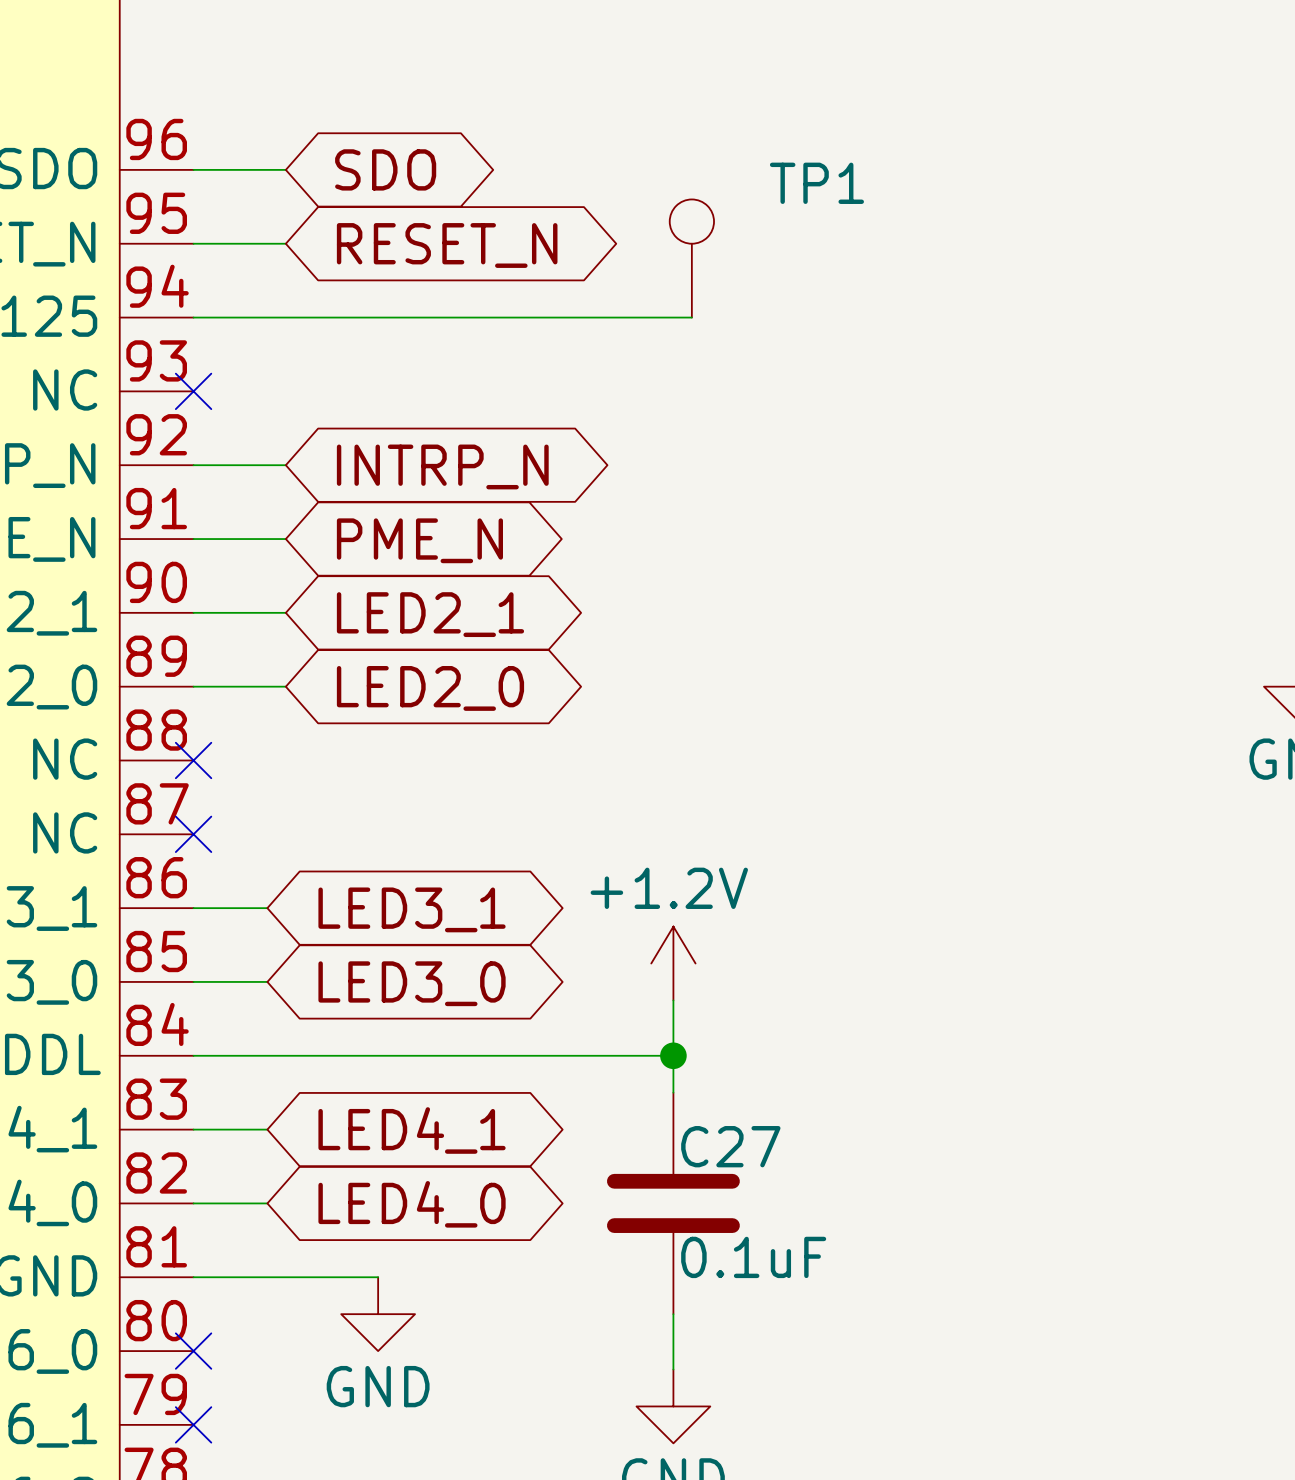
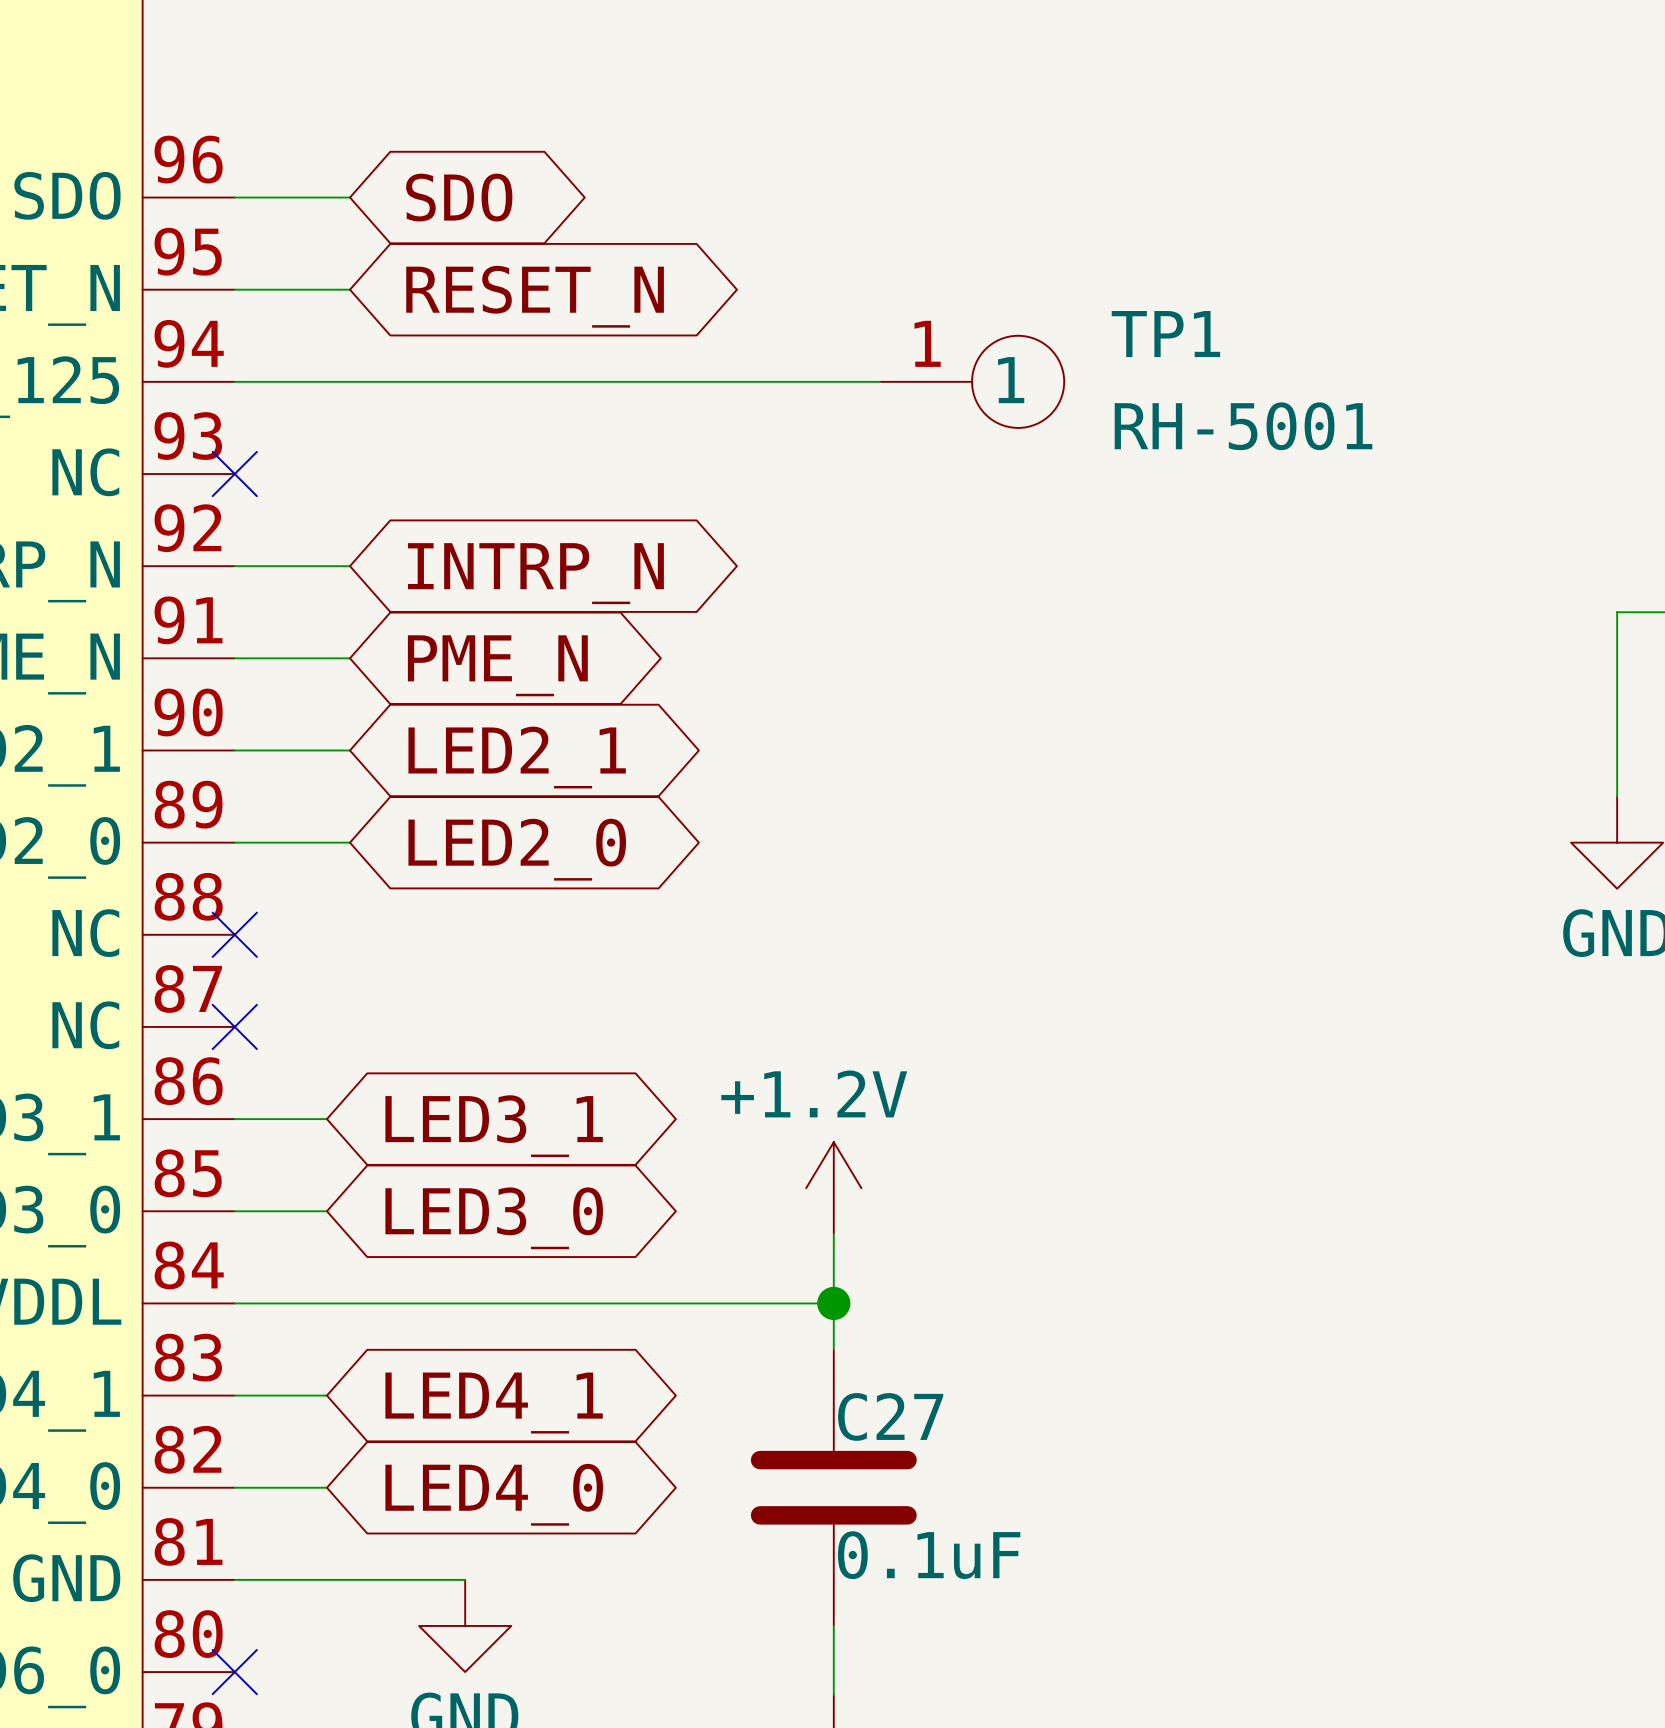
TP1 symbol: [669, 199, 715, 318] -> [879, 335, 1065, 428]
wire: none -> (856, 381) (879, 381)
TP1 value: none -> RH-5001 (1243, 426)

